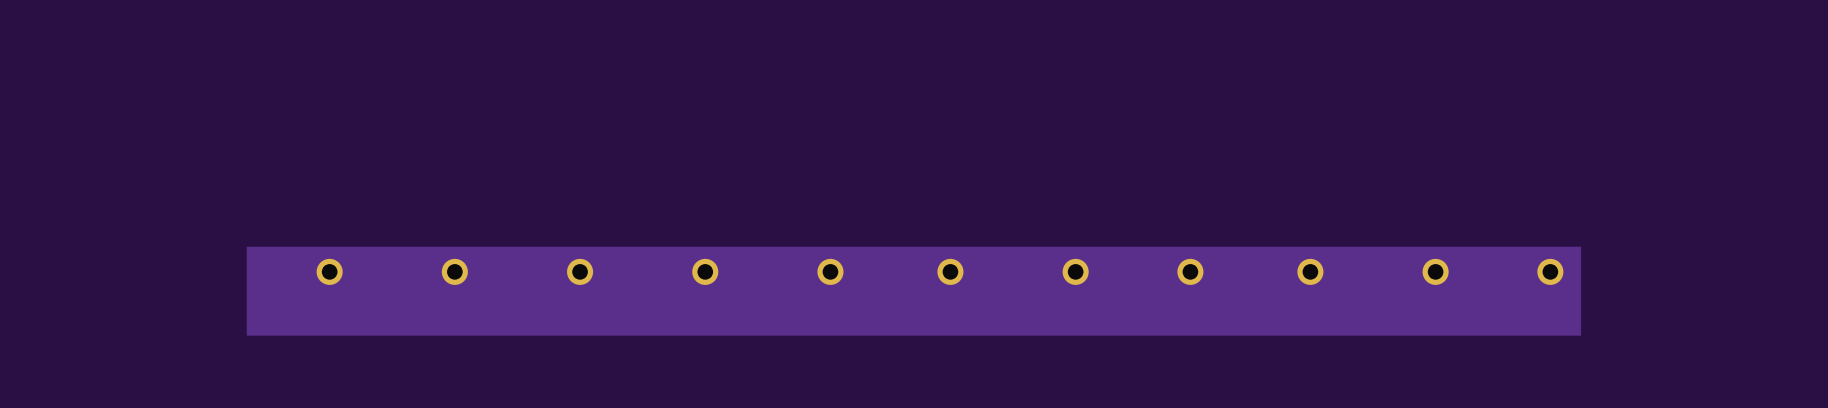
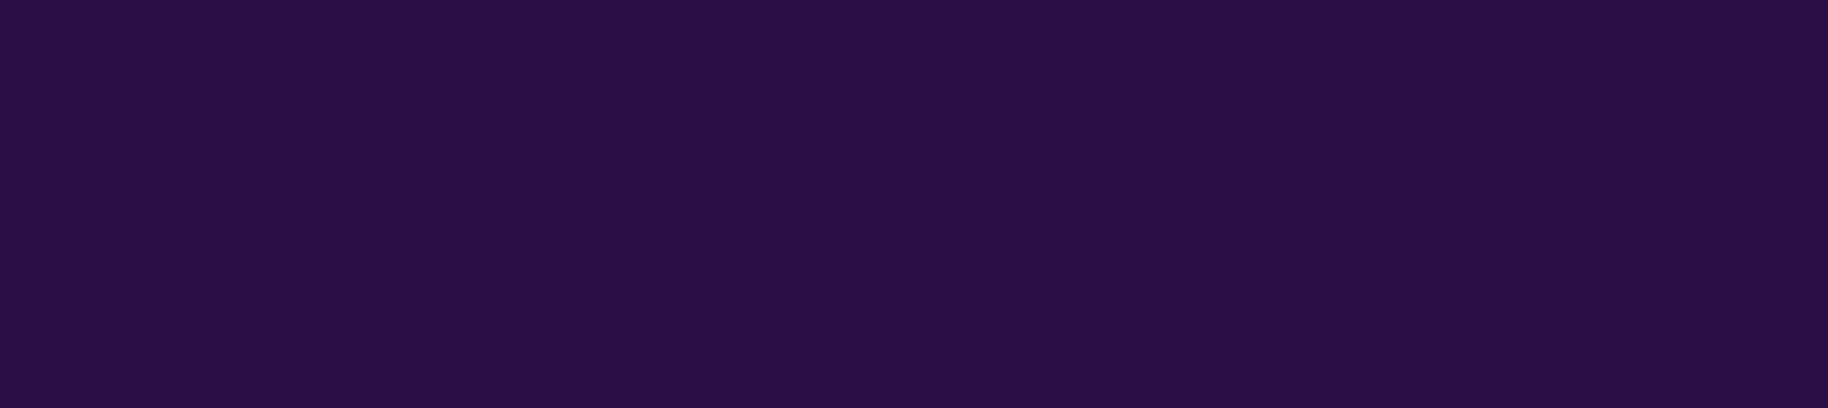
part: (913, 291) -> none

